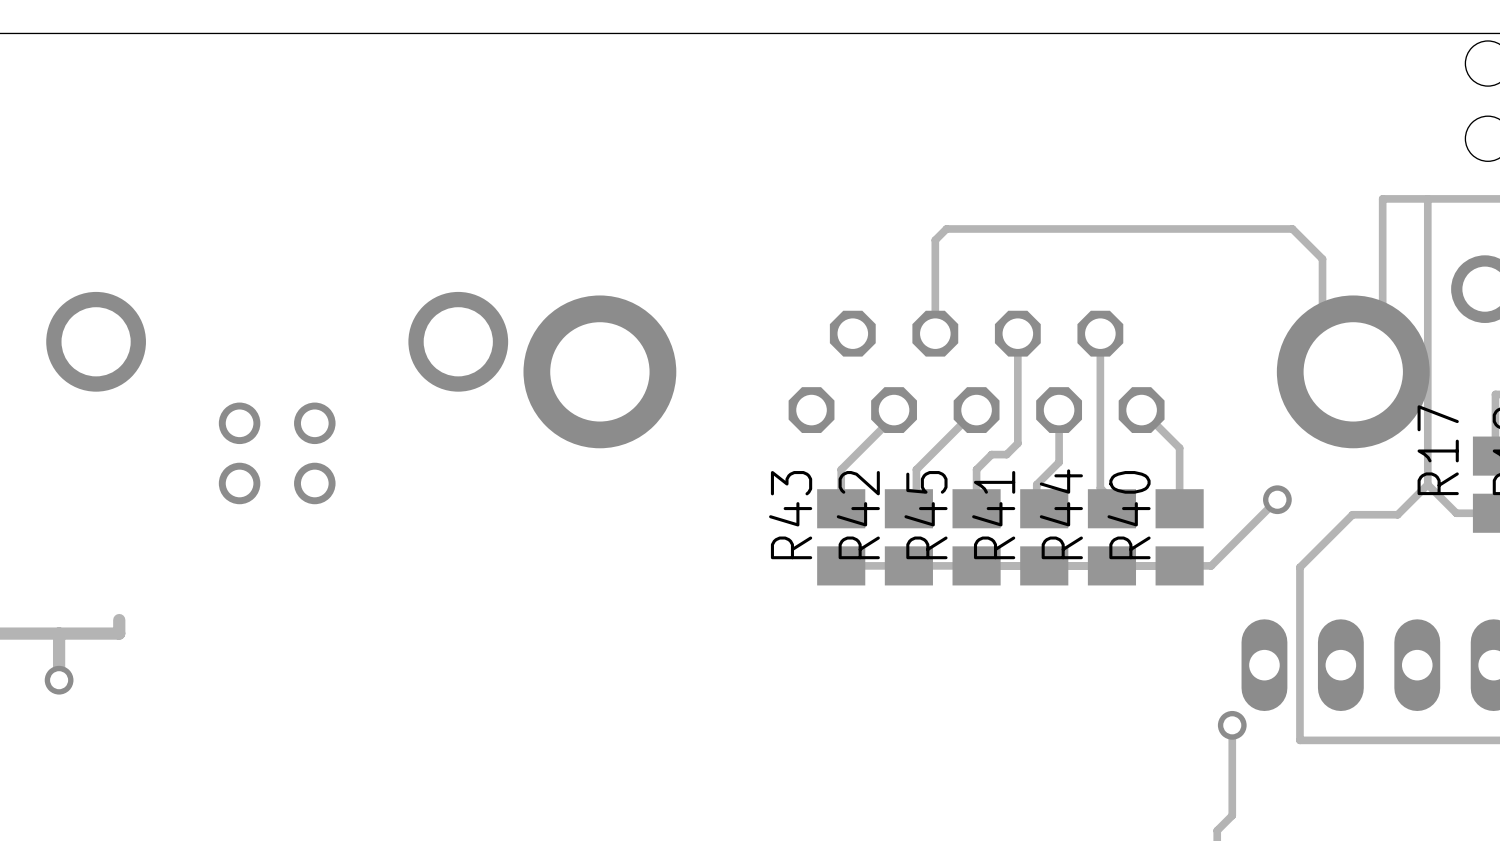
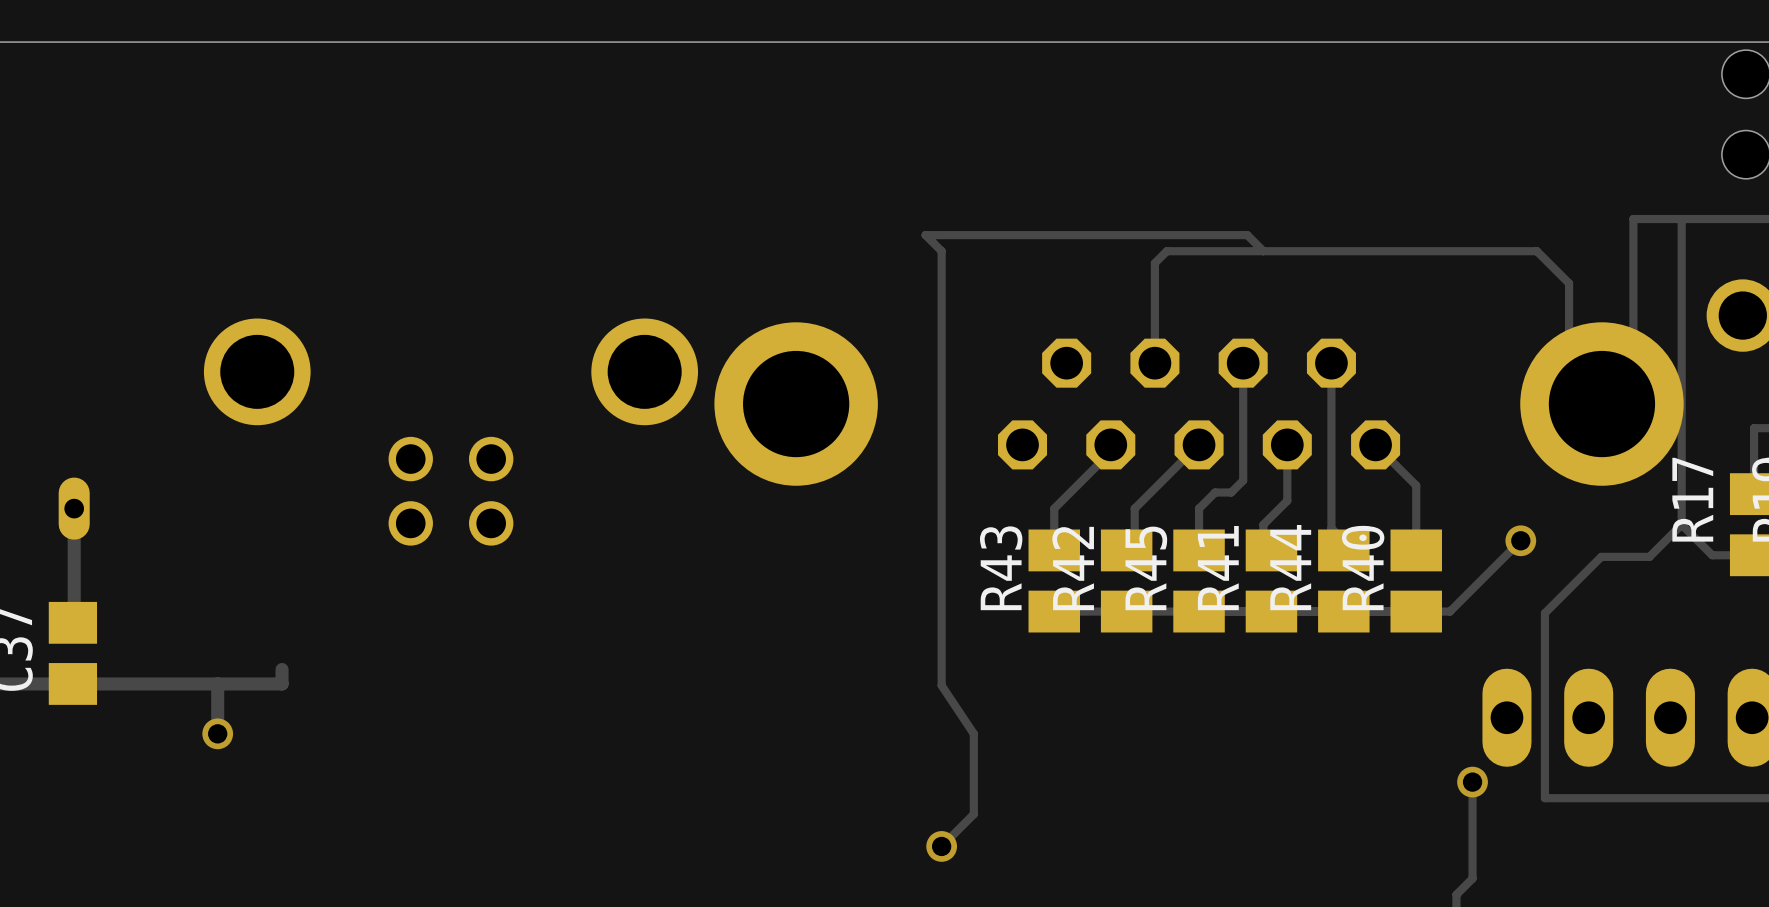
track: none -> (1263, 251) (1247, 235) (925, 235) (941, 251) (941, 685) (973, 733) (973, 814) (941, 846)
via: none -> (941, 846)

